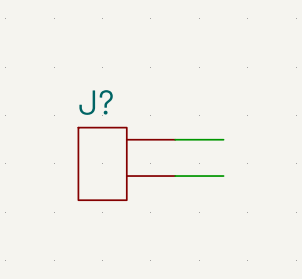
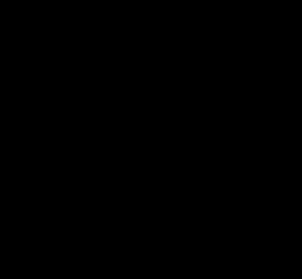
wire: (175, 139) (223, 139) -> none
J?: (126, 163) -> none
wire: (175, 176) (223, 176) -> none

